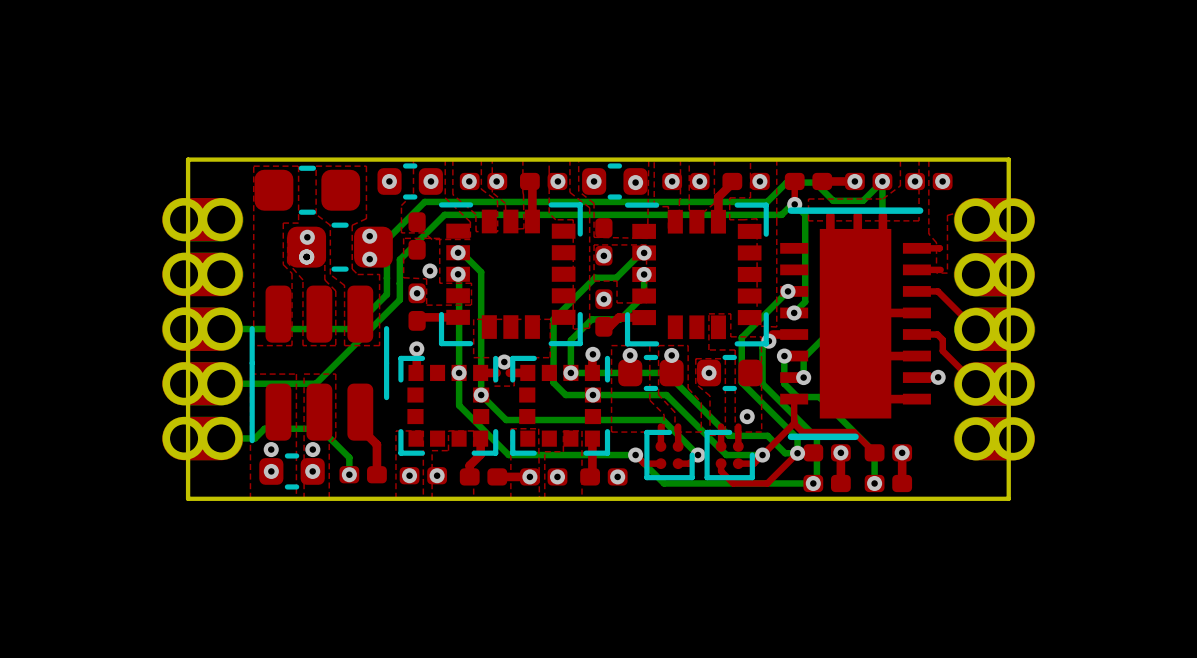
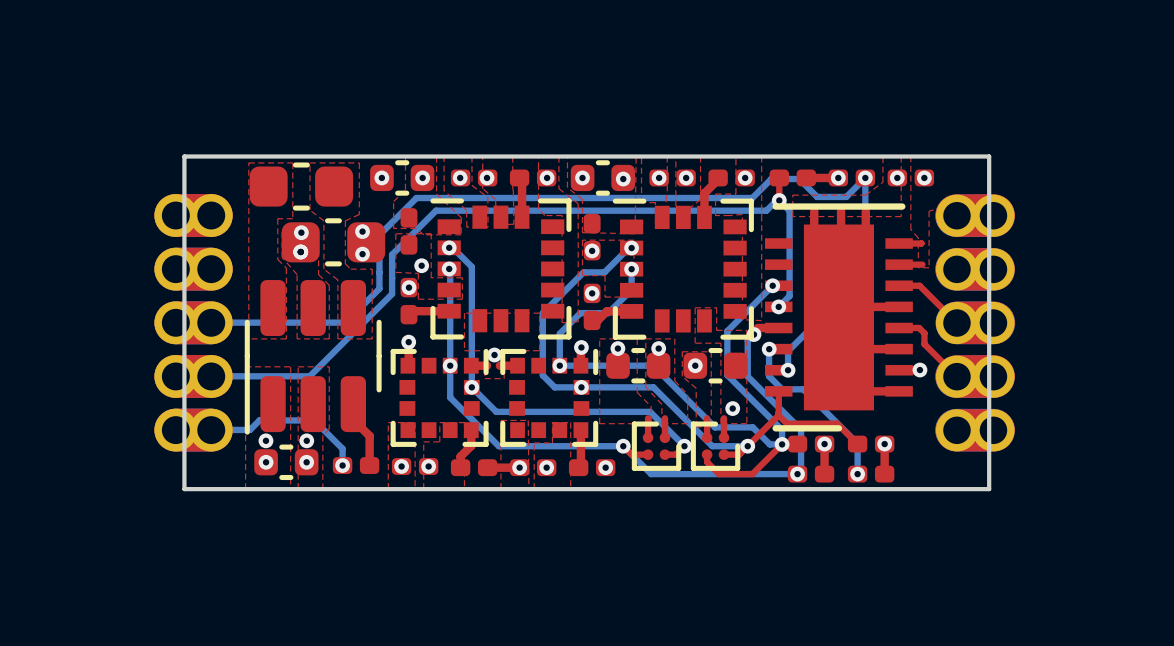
part footprint: [161, 198, 244, 461] -> [154, 194, 233, 452]

